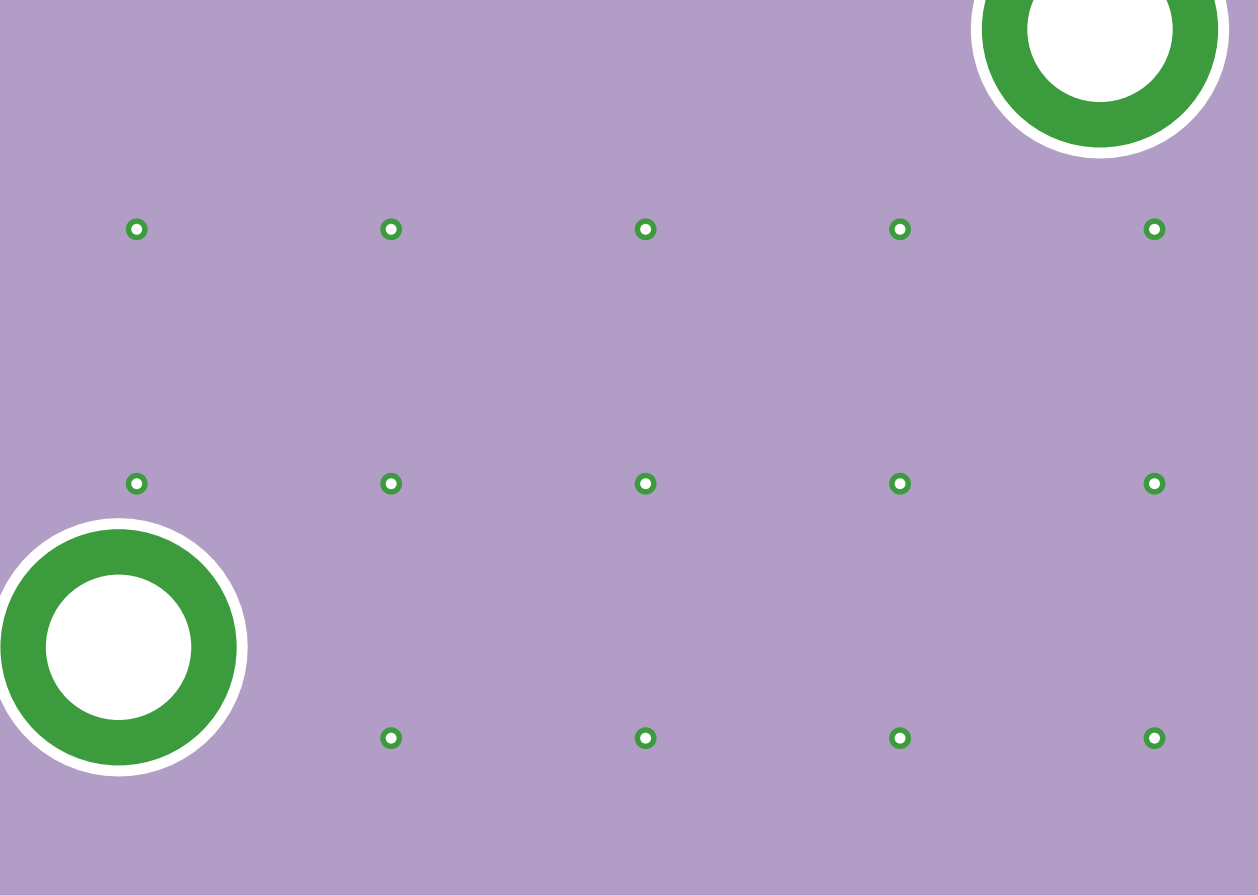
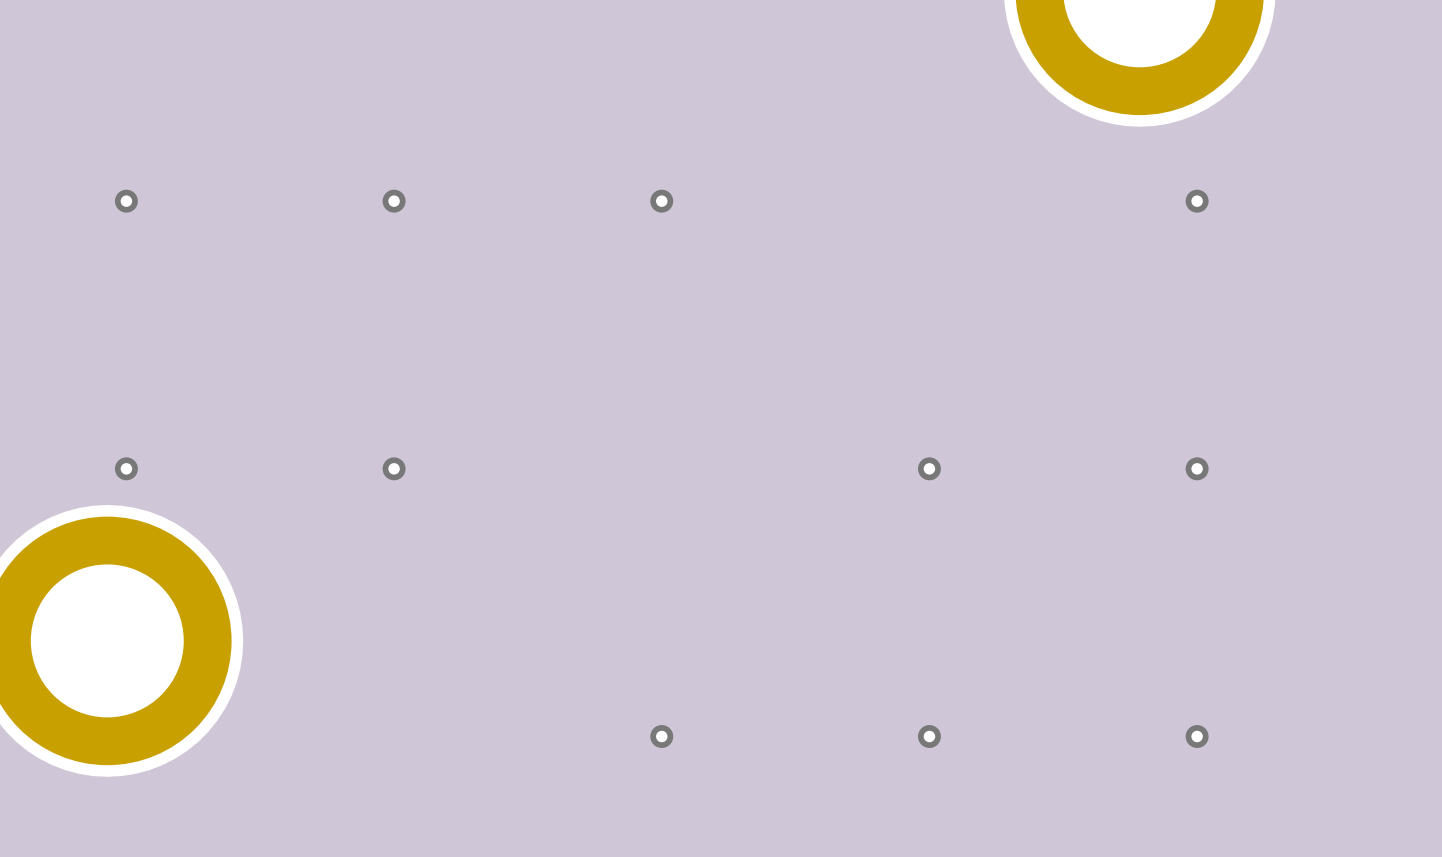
via: (900, 229) -> none
via: (645, 483) -> none
via: (391, 738) -> none

